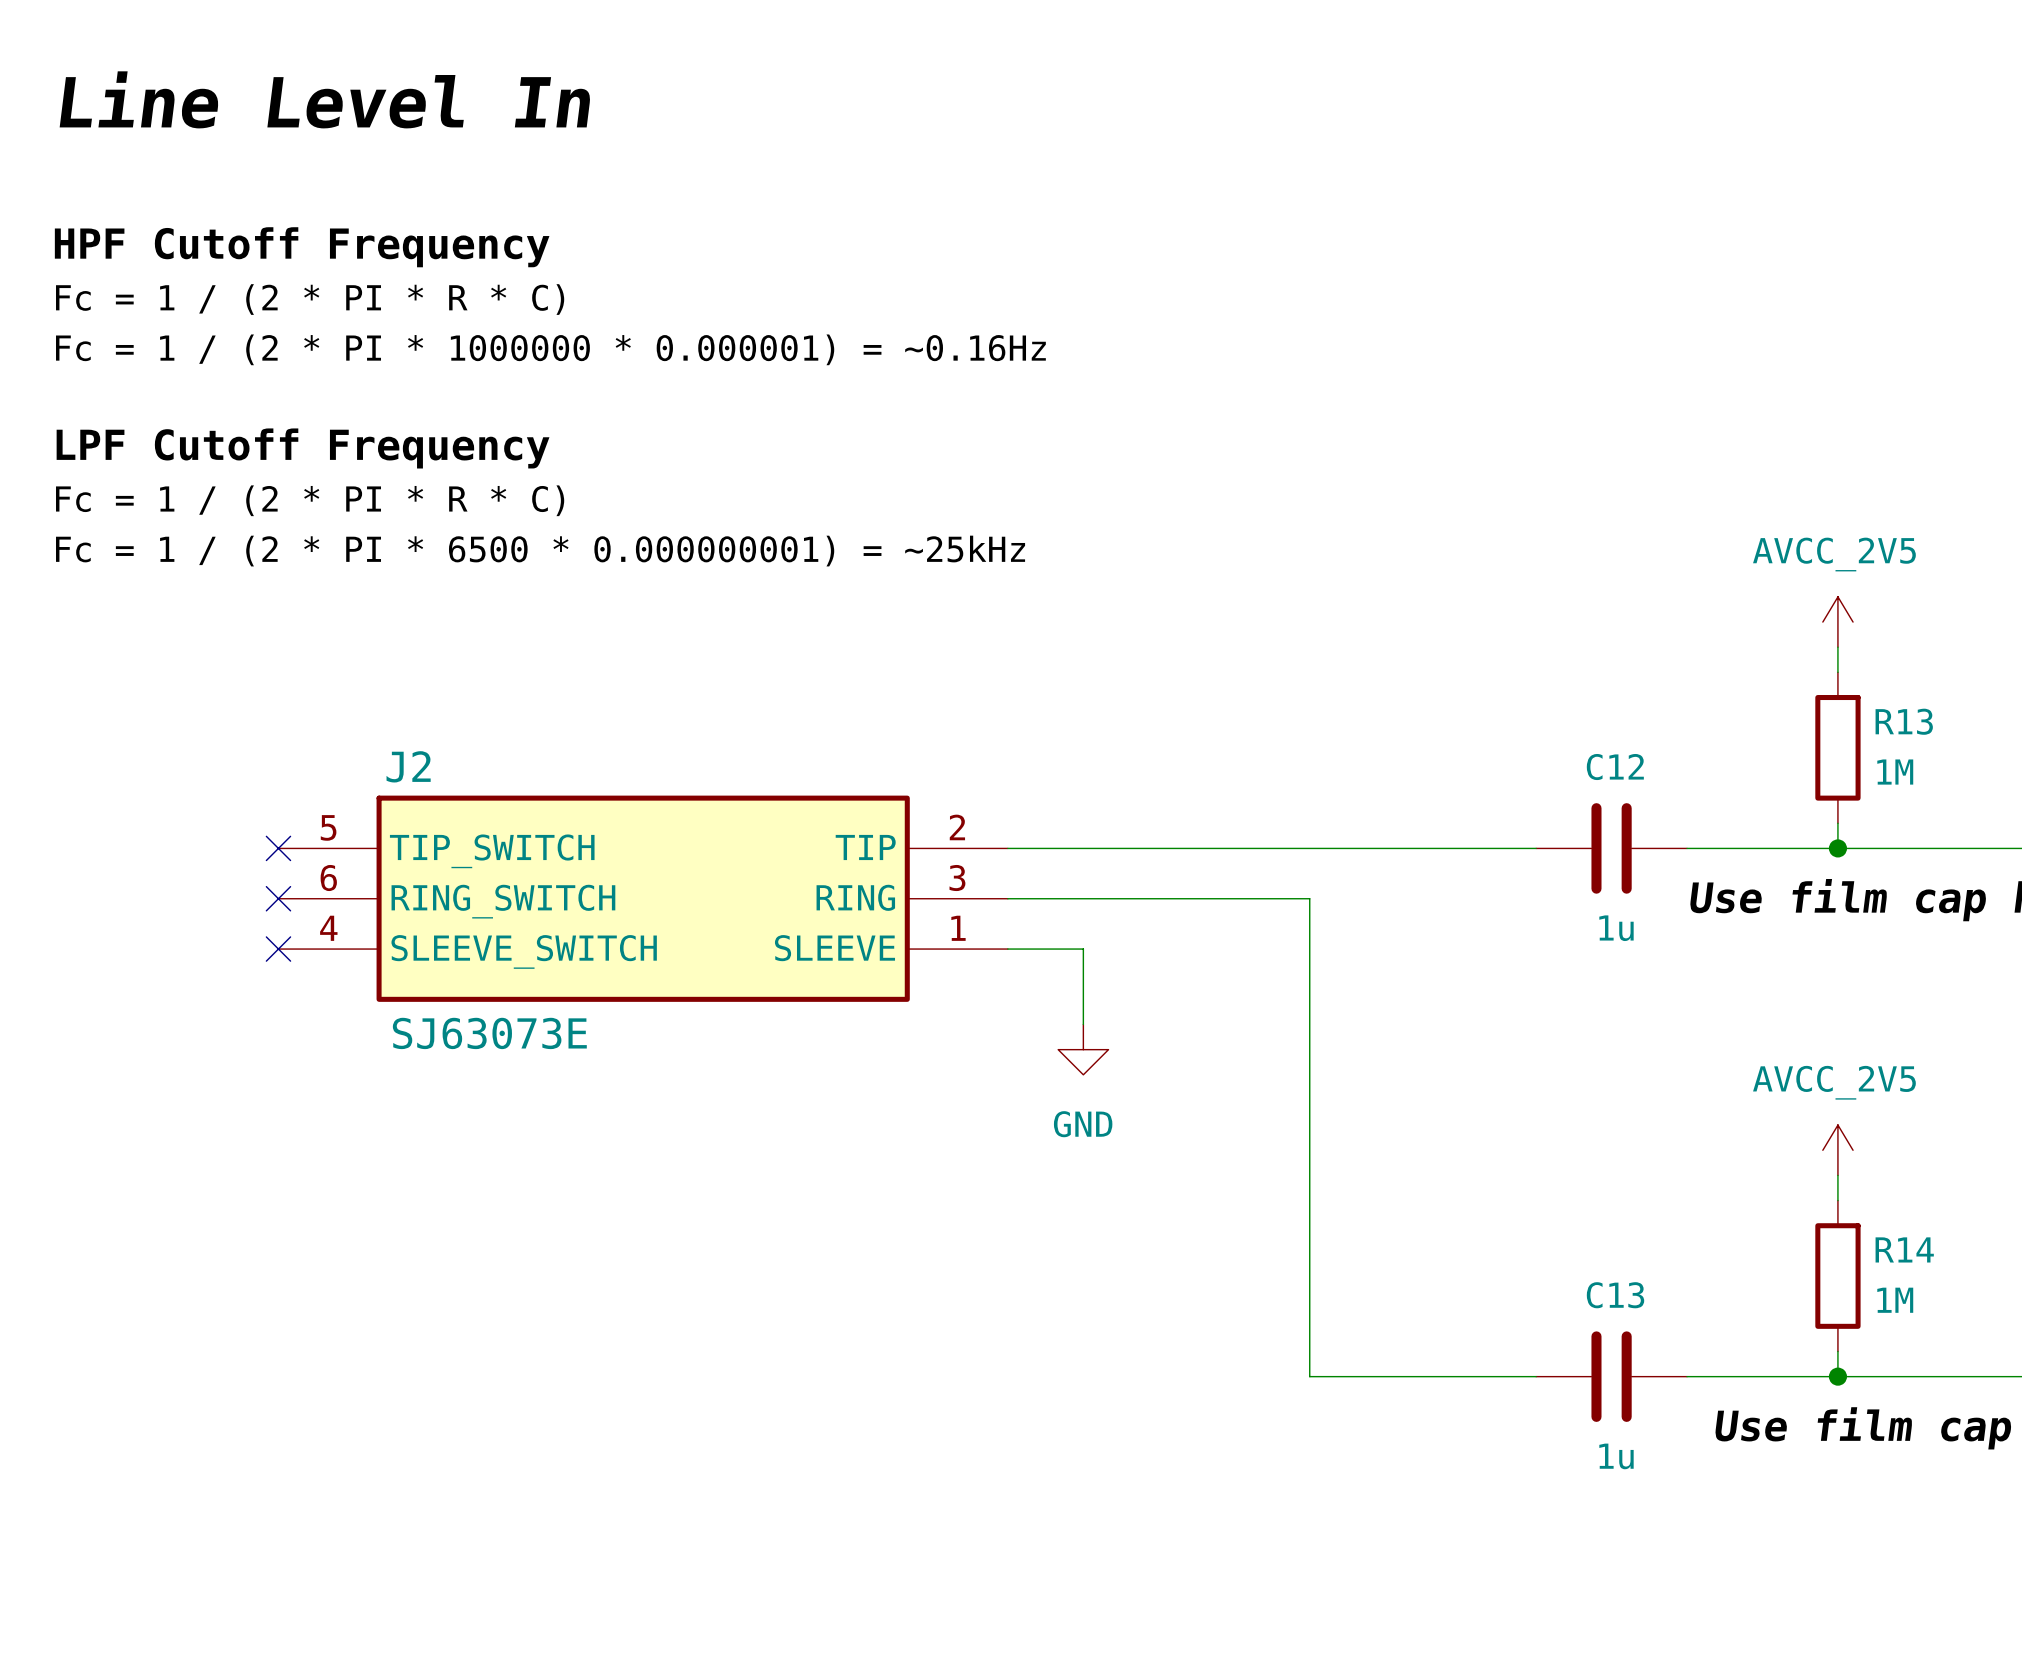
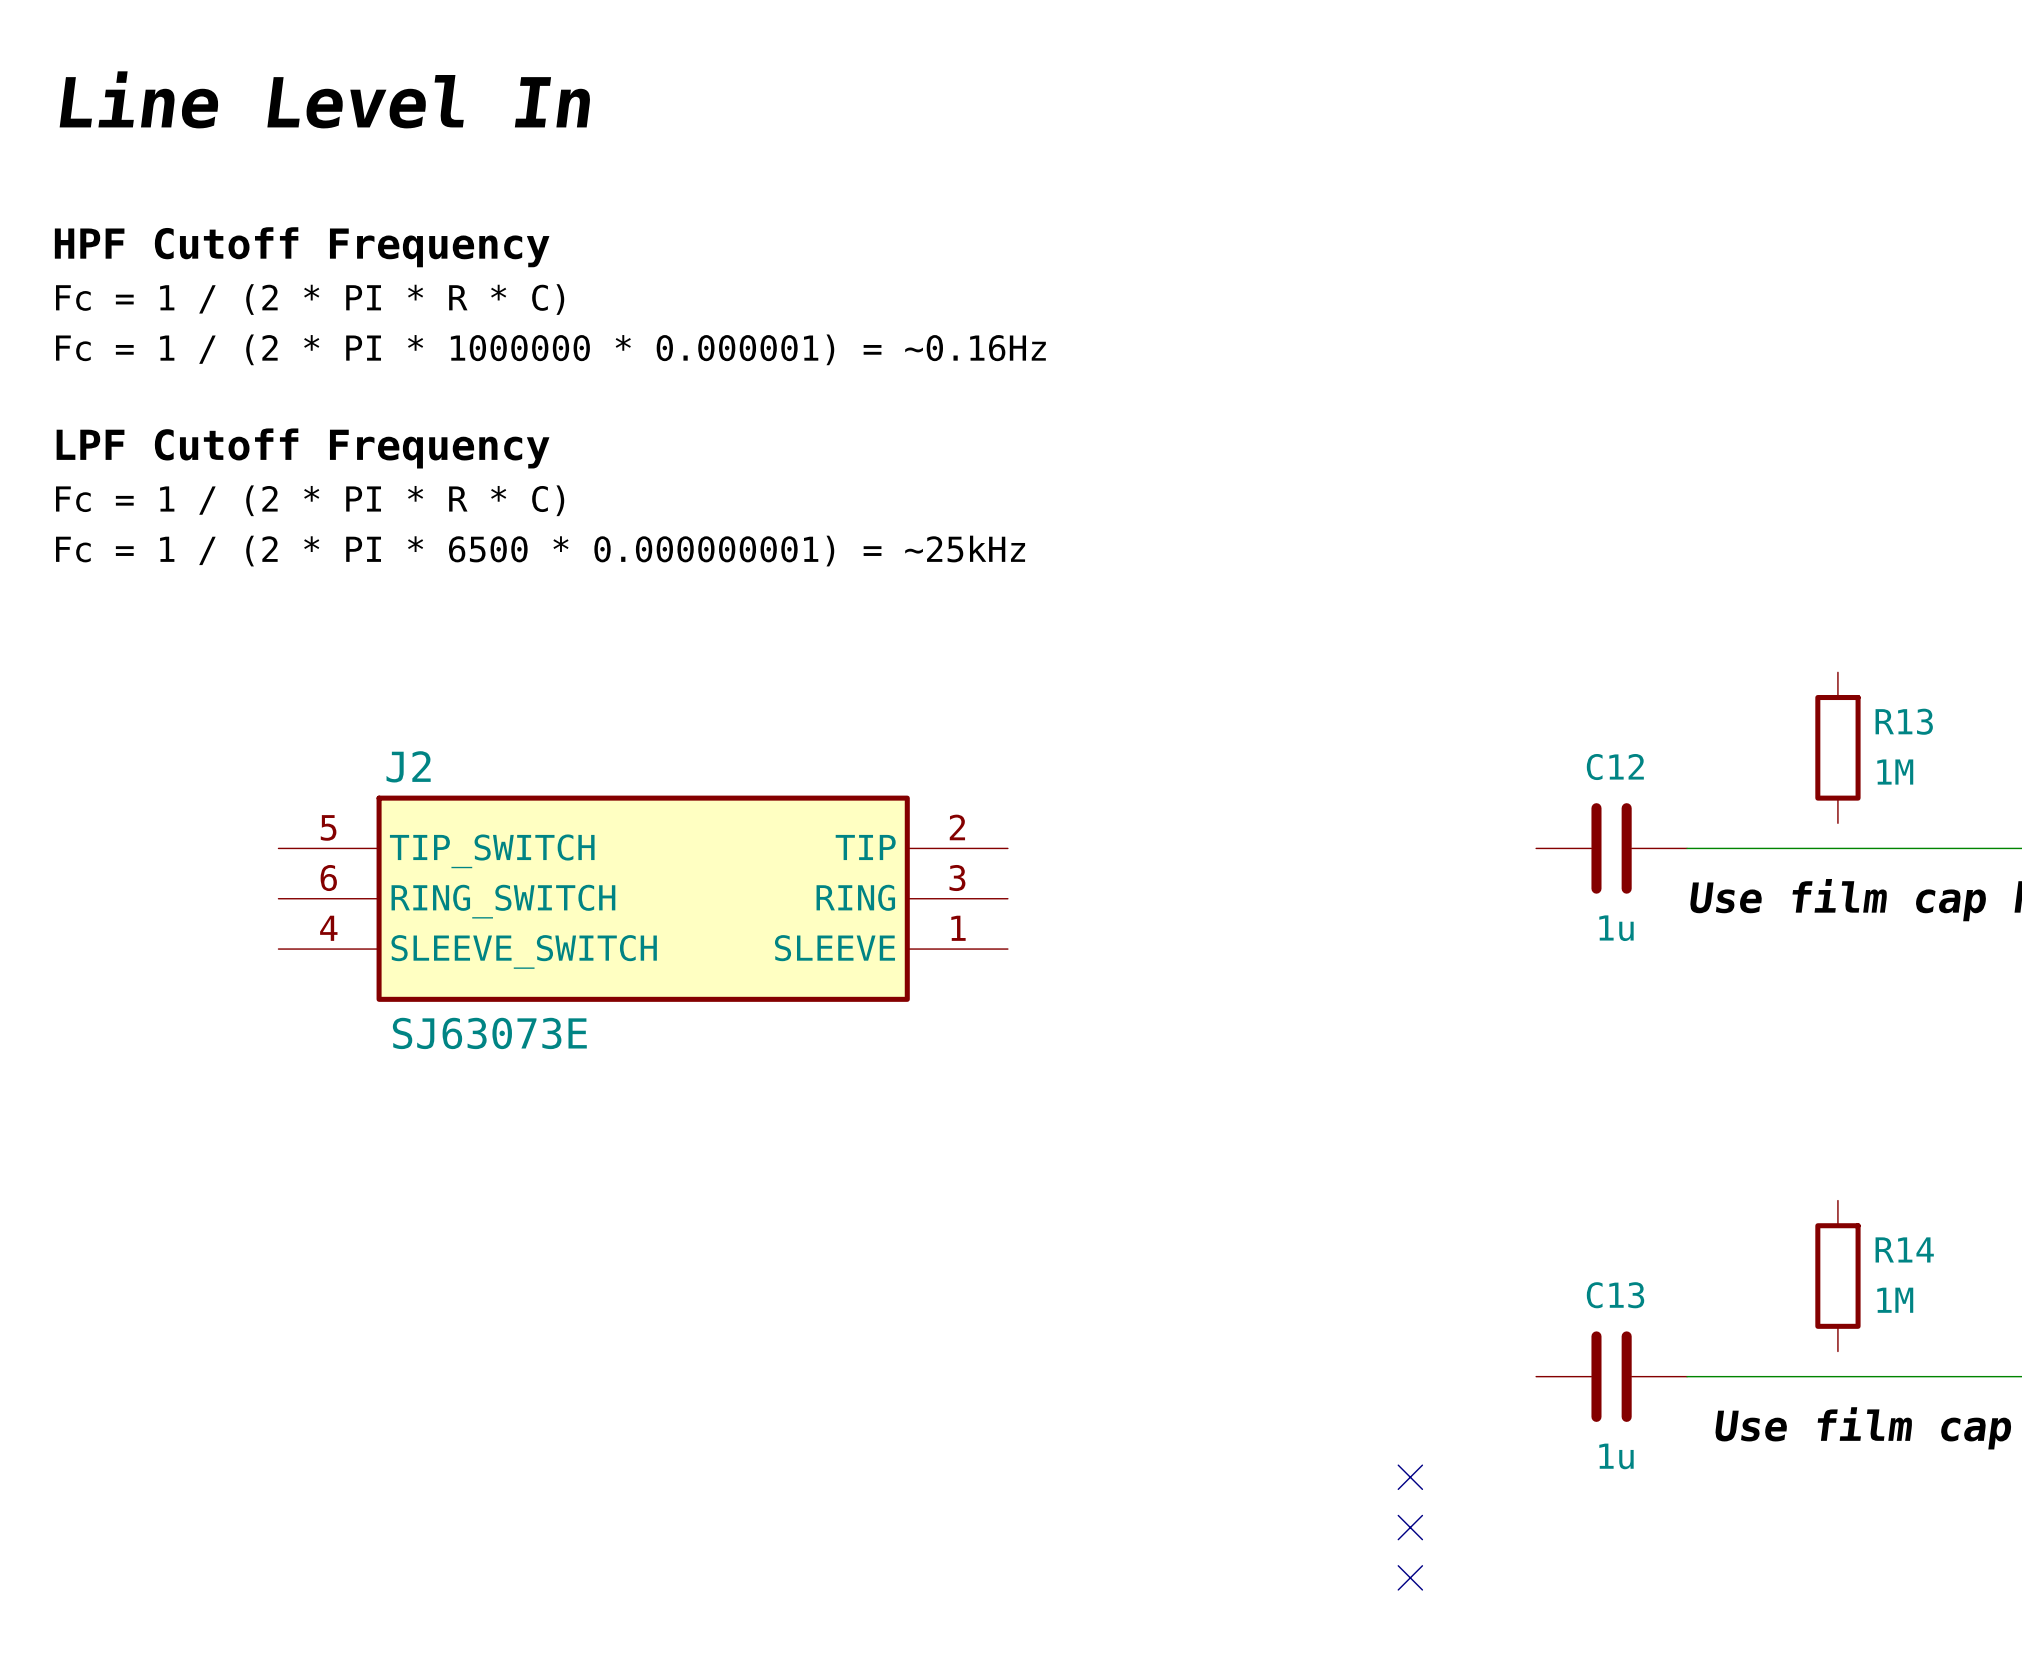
power symbol: AVCC_2V5 (1837, 622) -> none
wire: (1837, 647) (1837, 672) -> none
wire: (1837, 823) (1837, 848) -> none
no-connect mark: (278, 848) -> none
wire: (1007, 848) (1536, 848) -> none
junction: (1837, 848) -> none
no-connect mark: (278, 898) -> none
wire: (1007, 898) (1309, 898) (1309, 1376) (1536, 1376) -> none
no-connect mark: (278, 949) -> none
wire: (1007, 949) (1083, 949) (1083, 1024) -> none
power symbol: GND (1083, 1049) -> none
power symbol: AVCC_2V5 (1837, 1150) -> none
wire: (1837, 1175) (1837, 1200) -> none
wire: (1837, 1351) (1837, 1376) -> none
junction: (1837, 1376) -> none
no-connect mark: none -> (1410, 1477)
no-connect mark: none -> (1410, 1527)
no-connect mark: none -> (1410, 1577)

